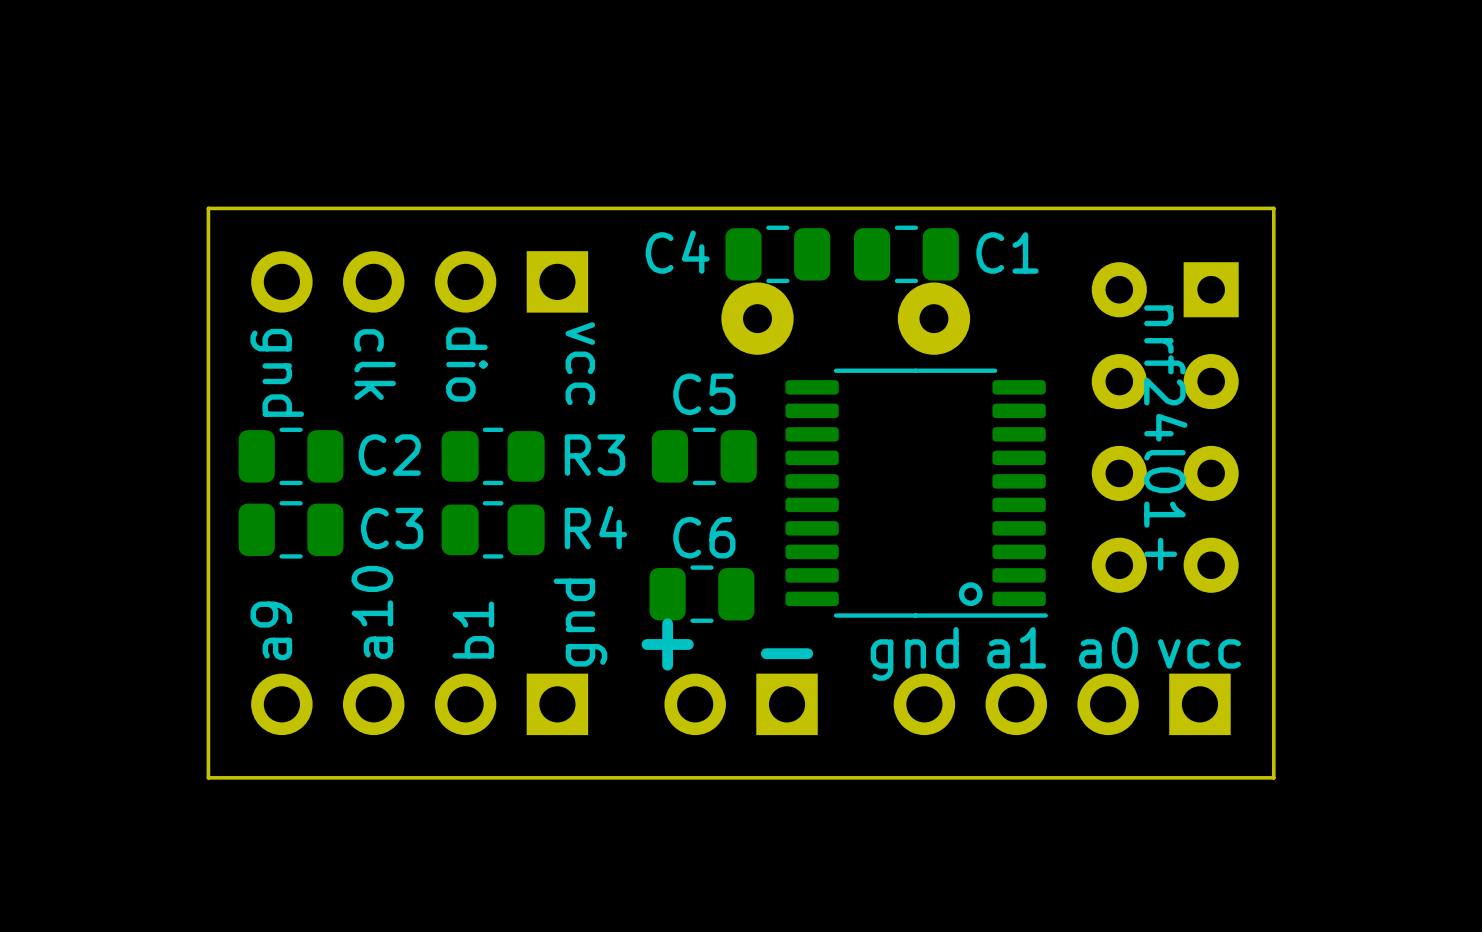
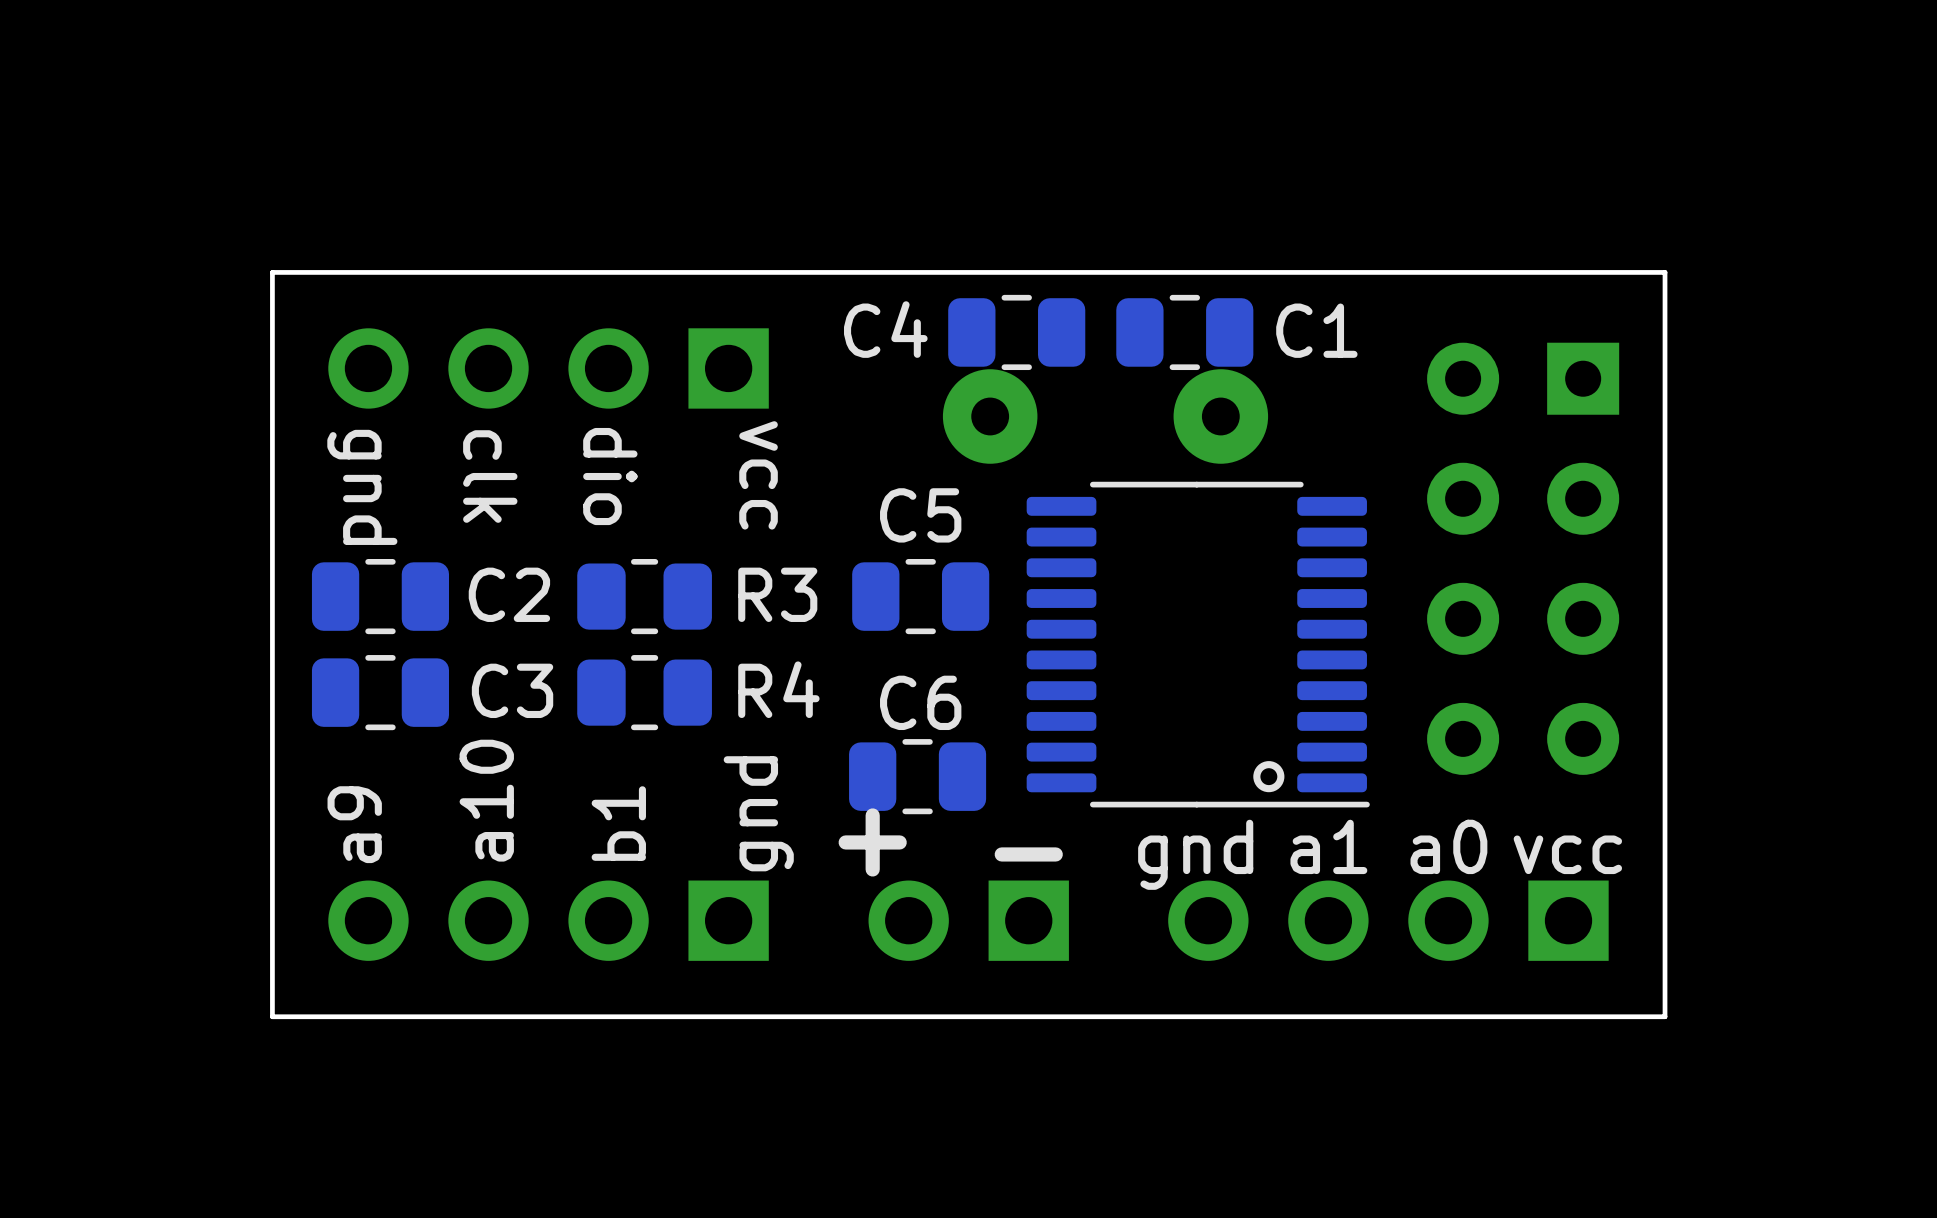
text: nrf24l01+ (1165, 438) -> none

